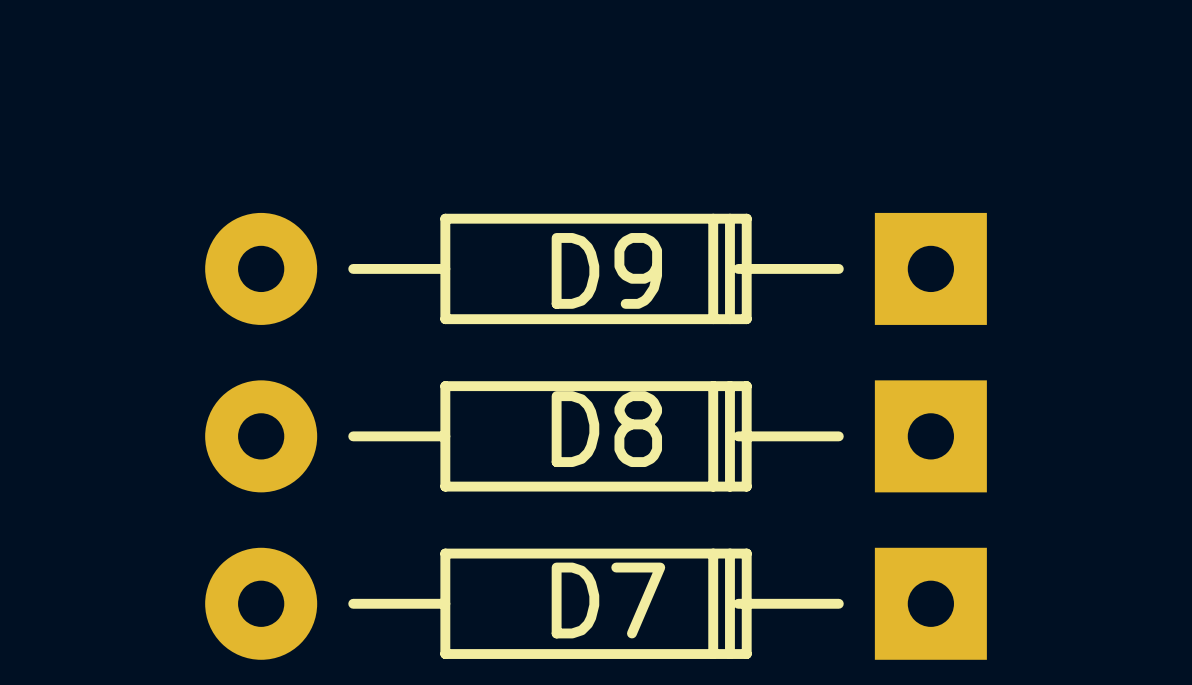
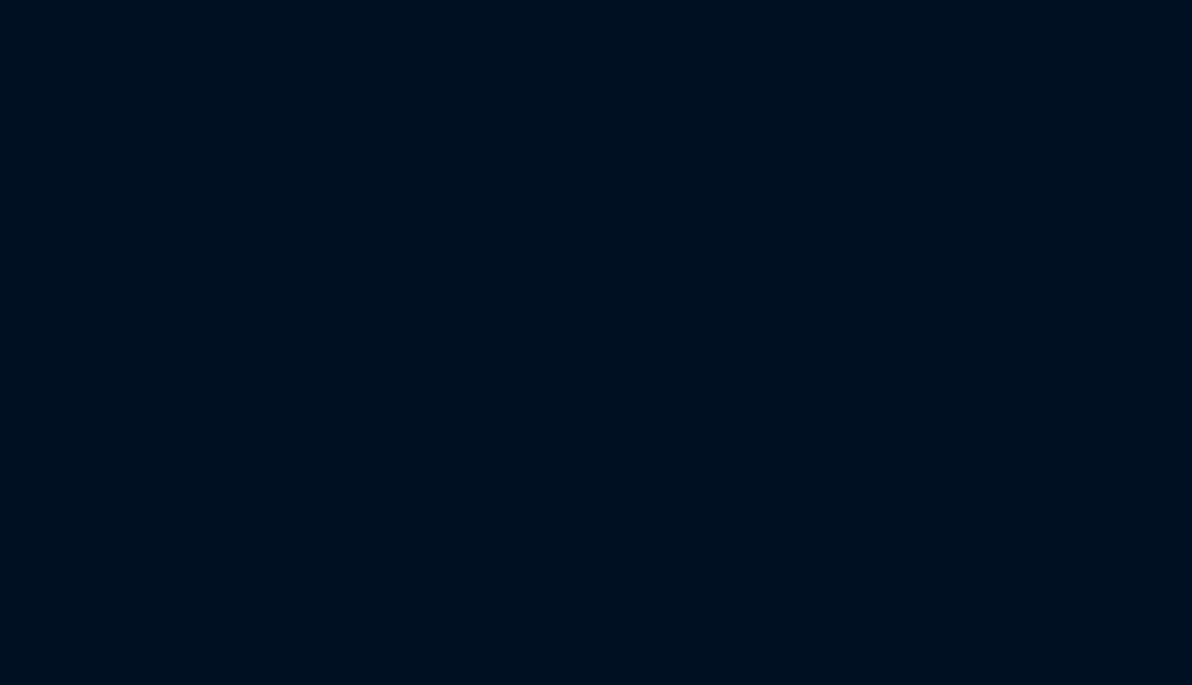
D9: (596, 268) -> none
D8: (596, 436) -> none
D7: (596, 603) -> none

